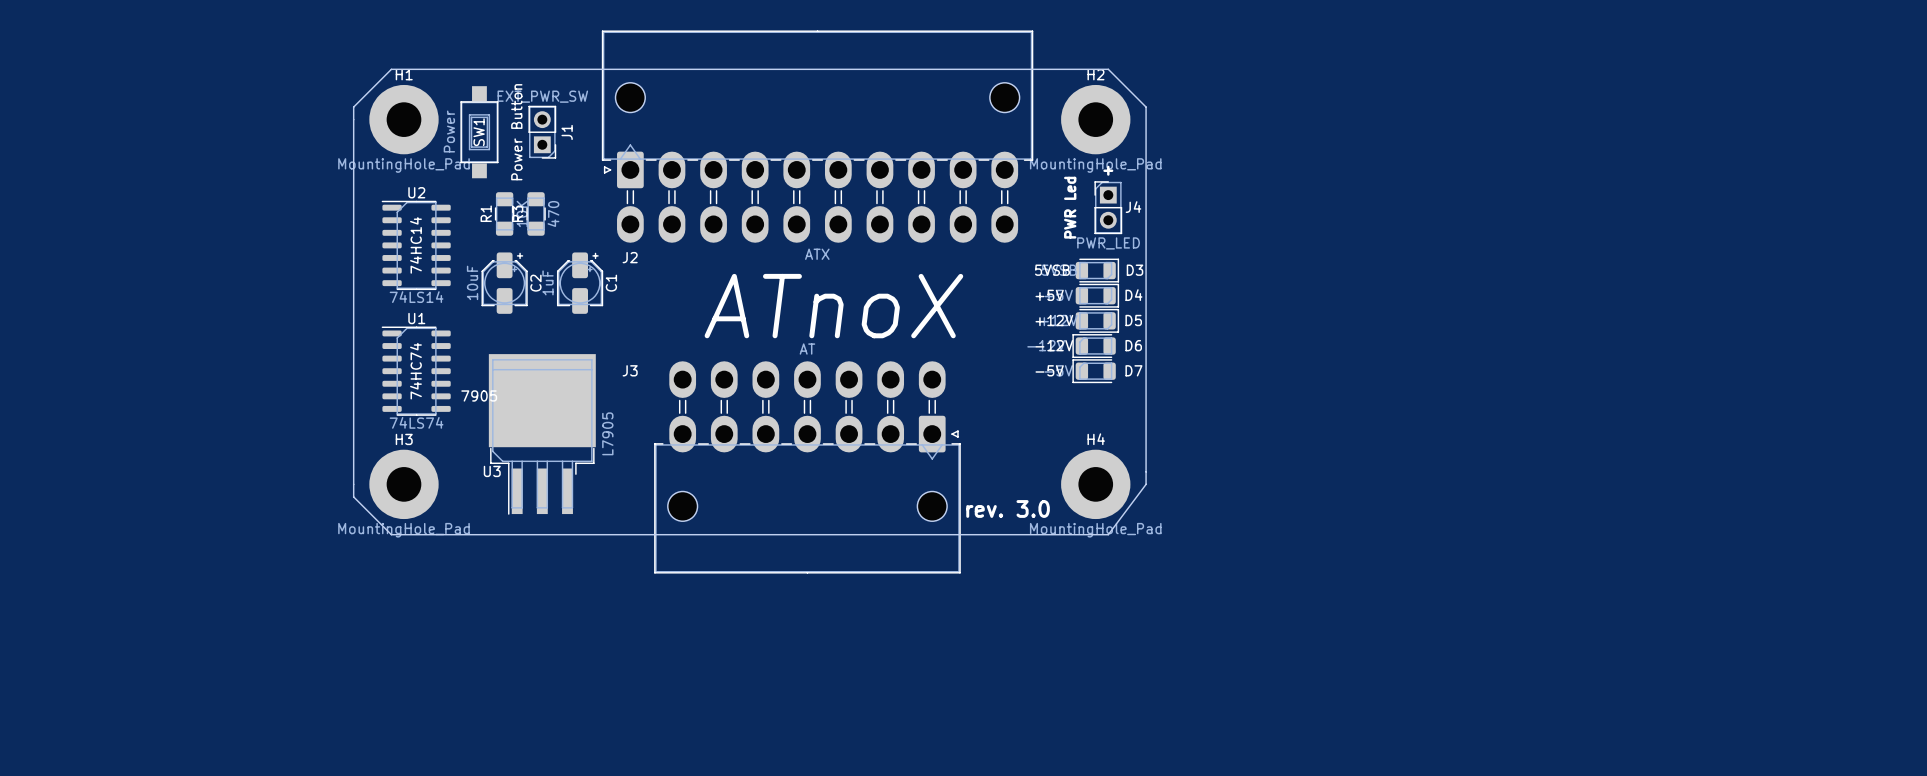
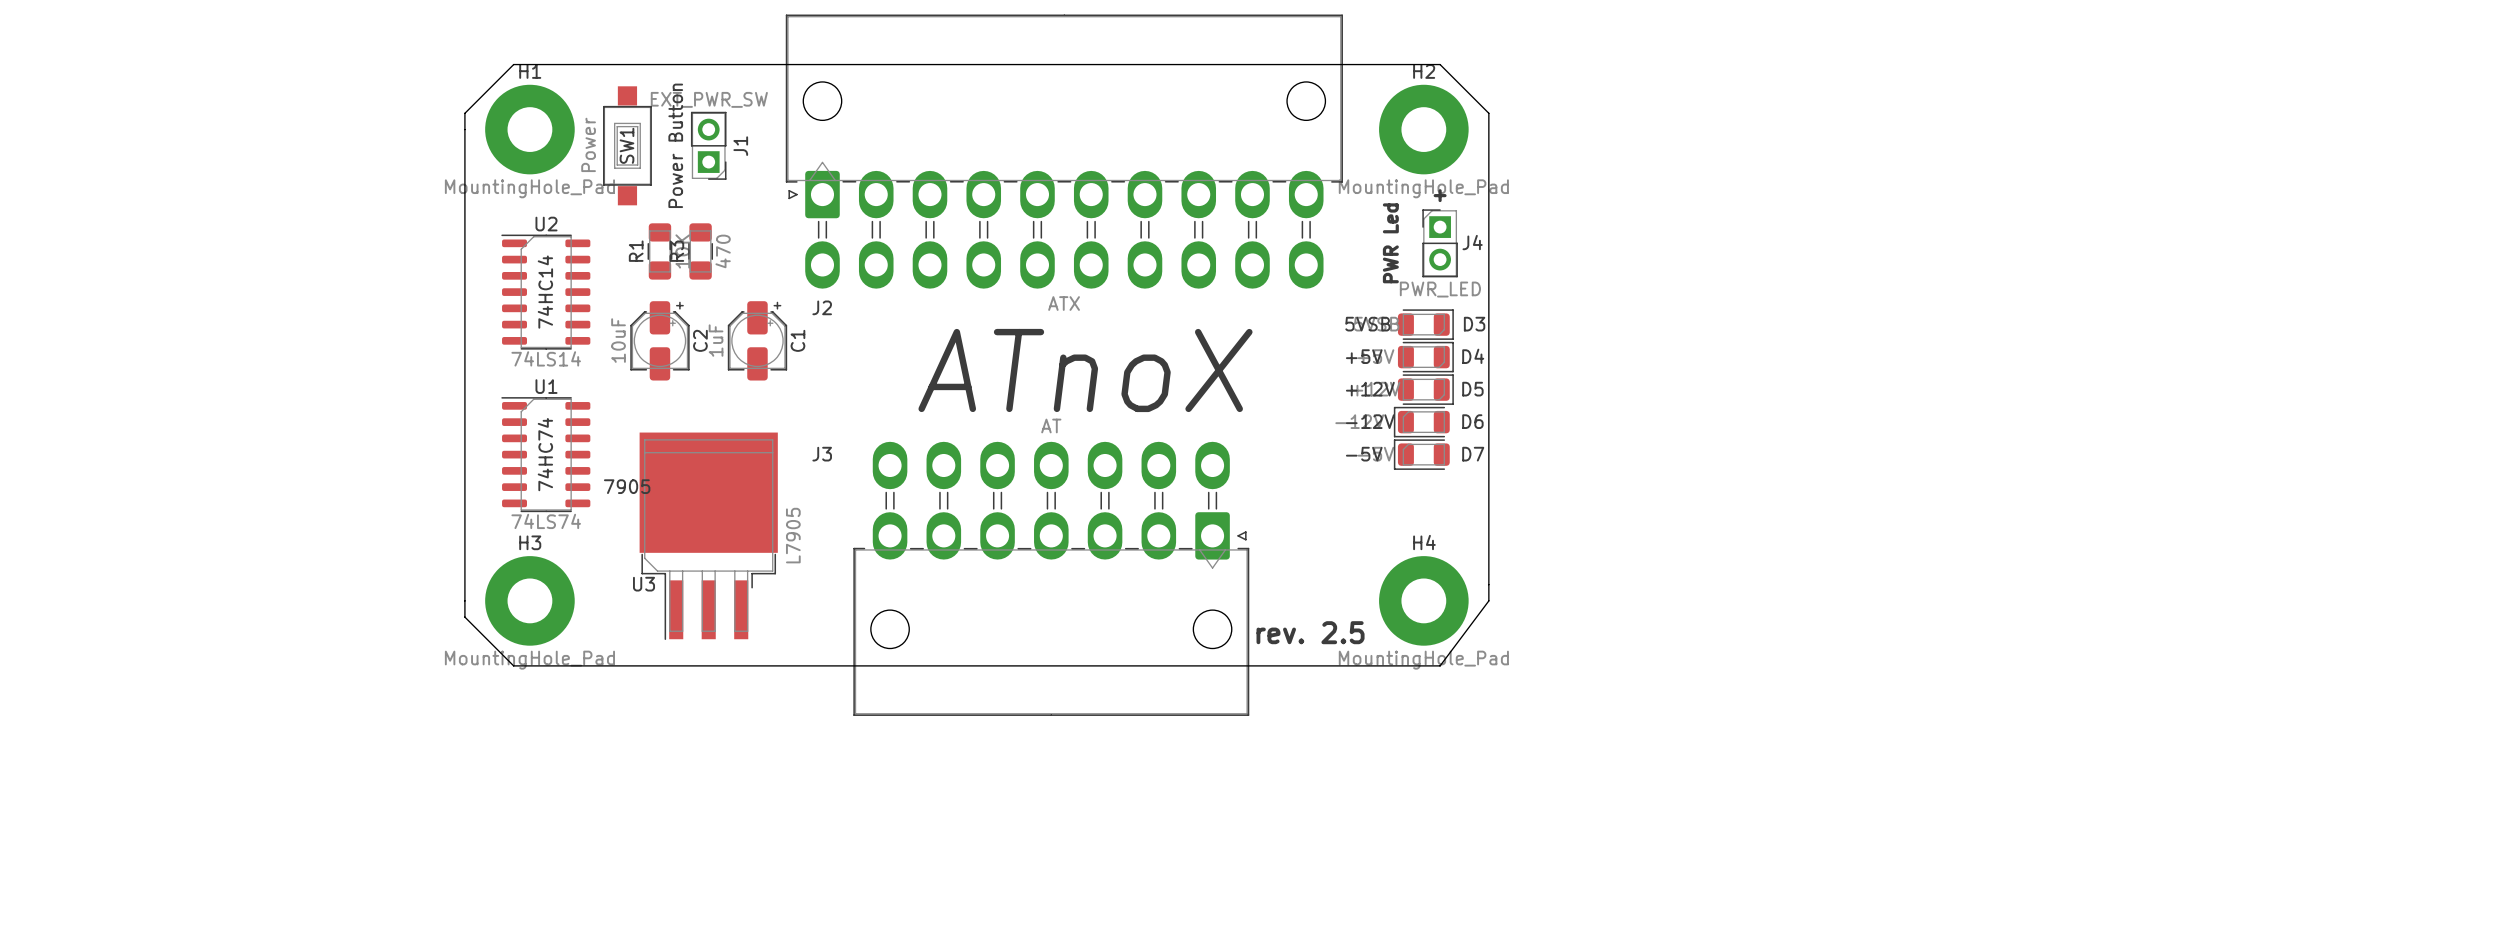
text: rev. 3.0 (1008, 508) -> rev. 2.5 (1310, 632)

